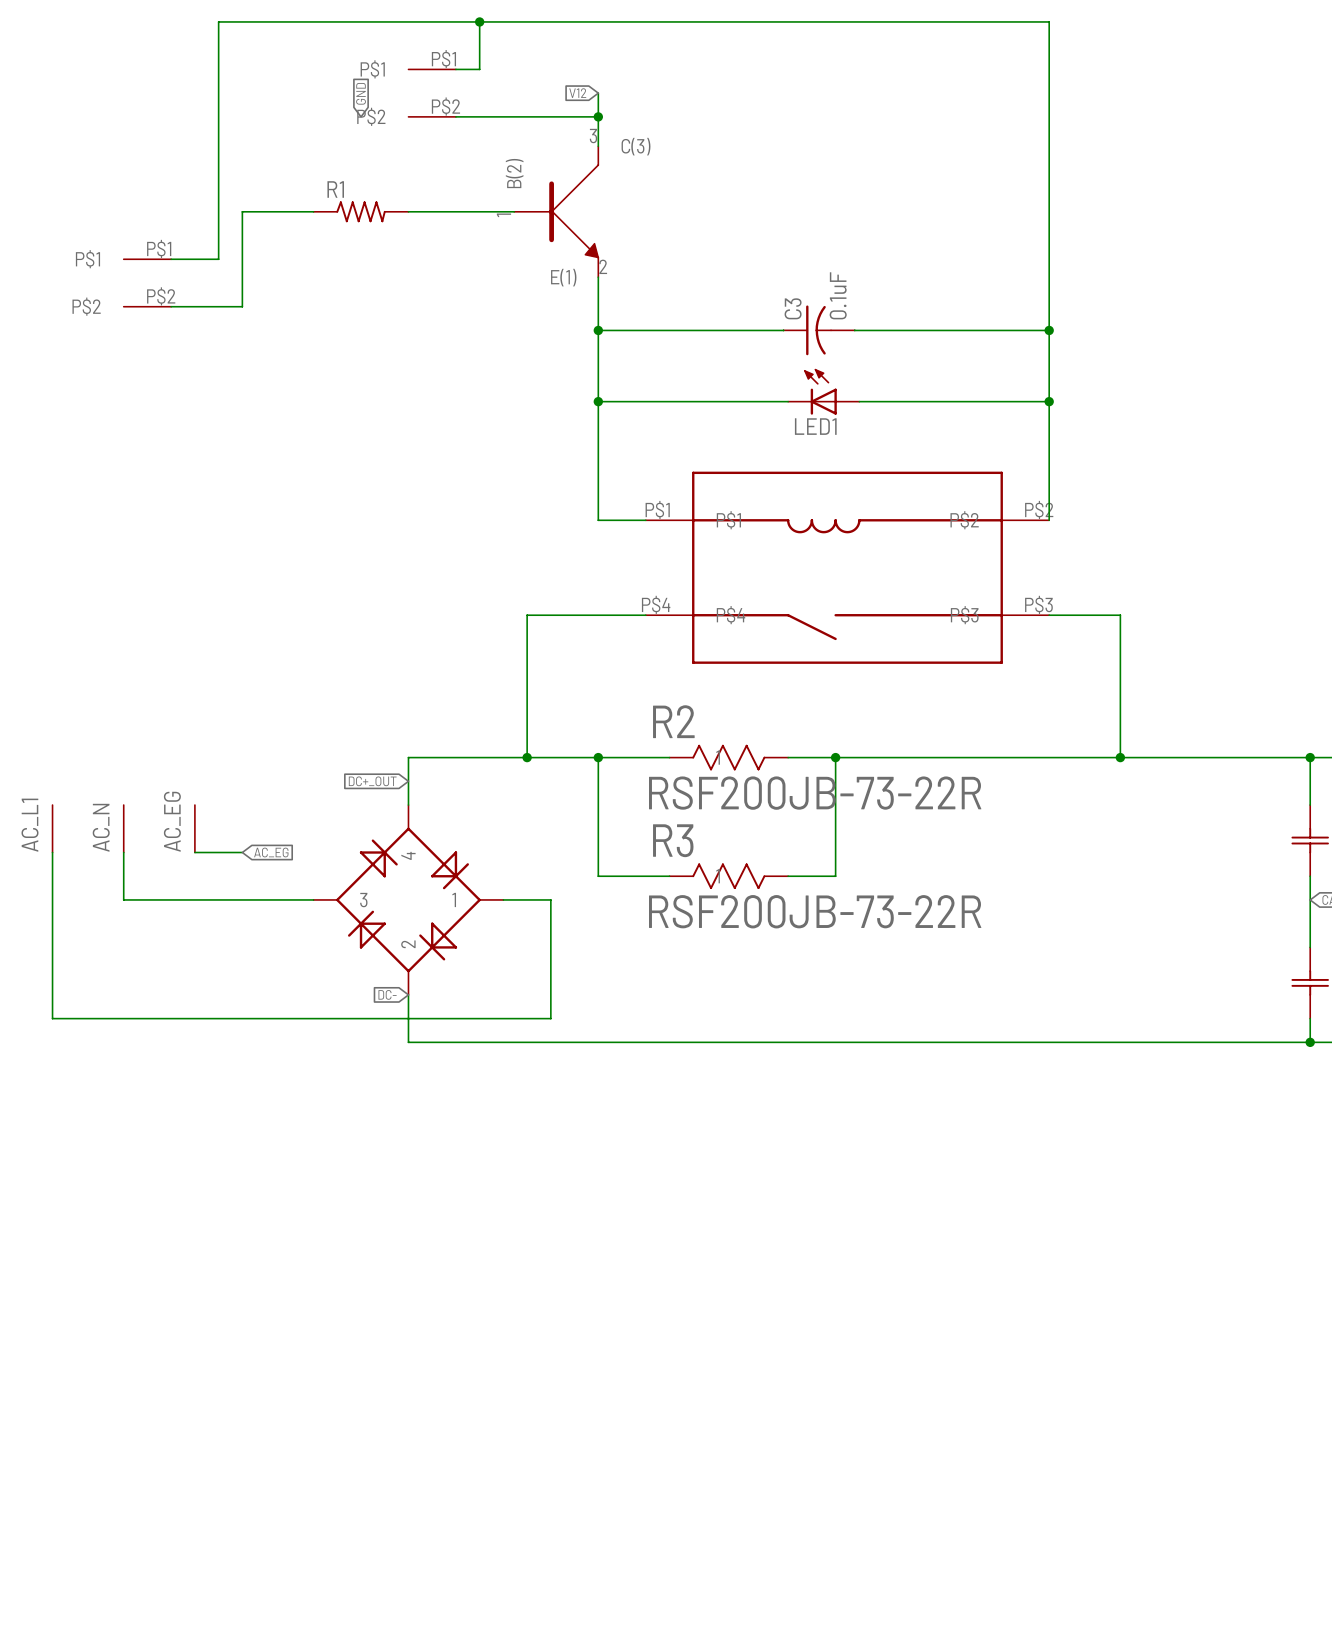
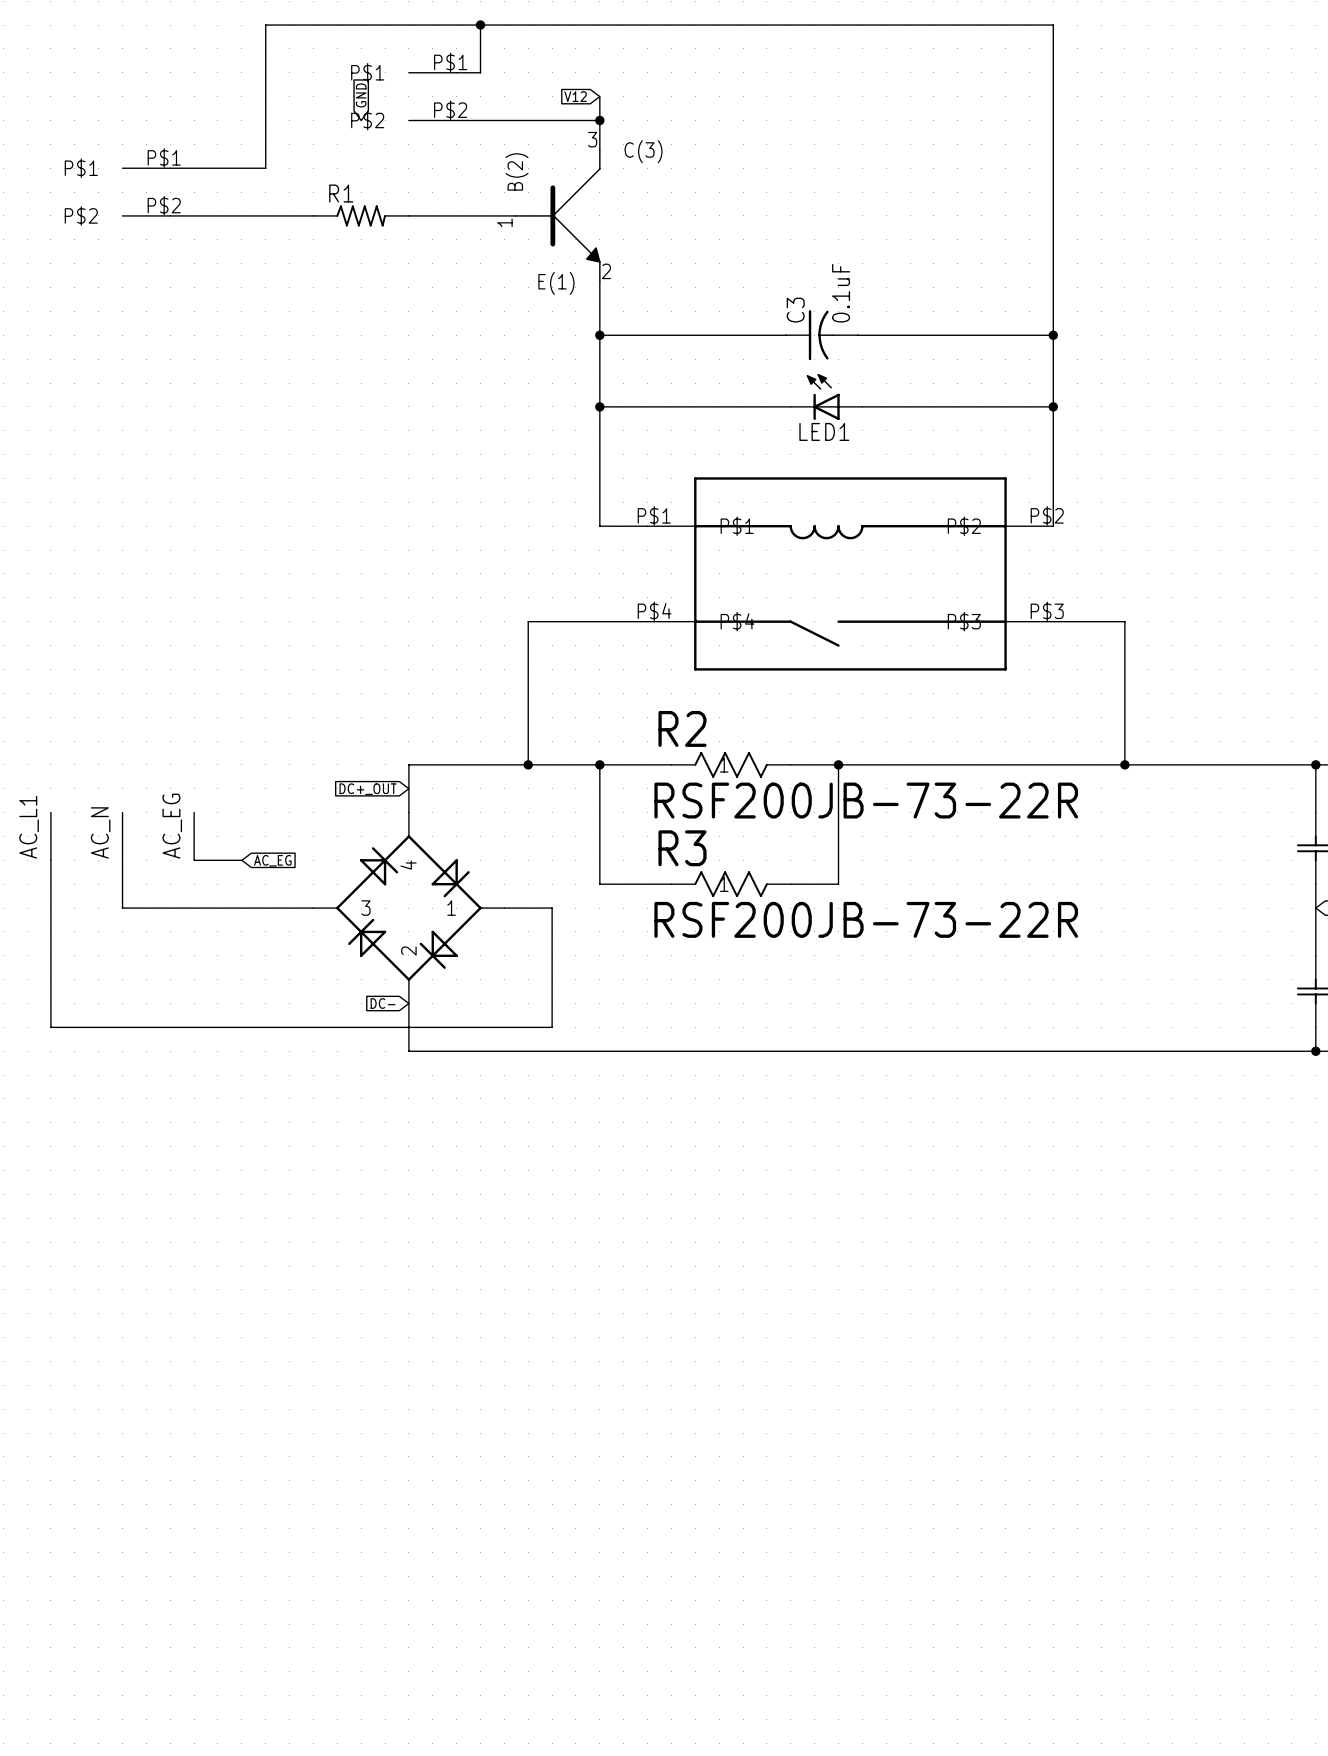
wire: (266, 21) (218, 21) (218, 259) (171, 259) -> (265, 25) (265, 168) (170, 168)
wire: (242, 211) (242, 306) (171, 306) -> (241, 215) (170, 215)
part position: (147, 282) -> (146, 192)

